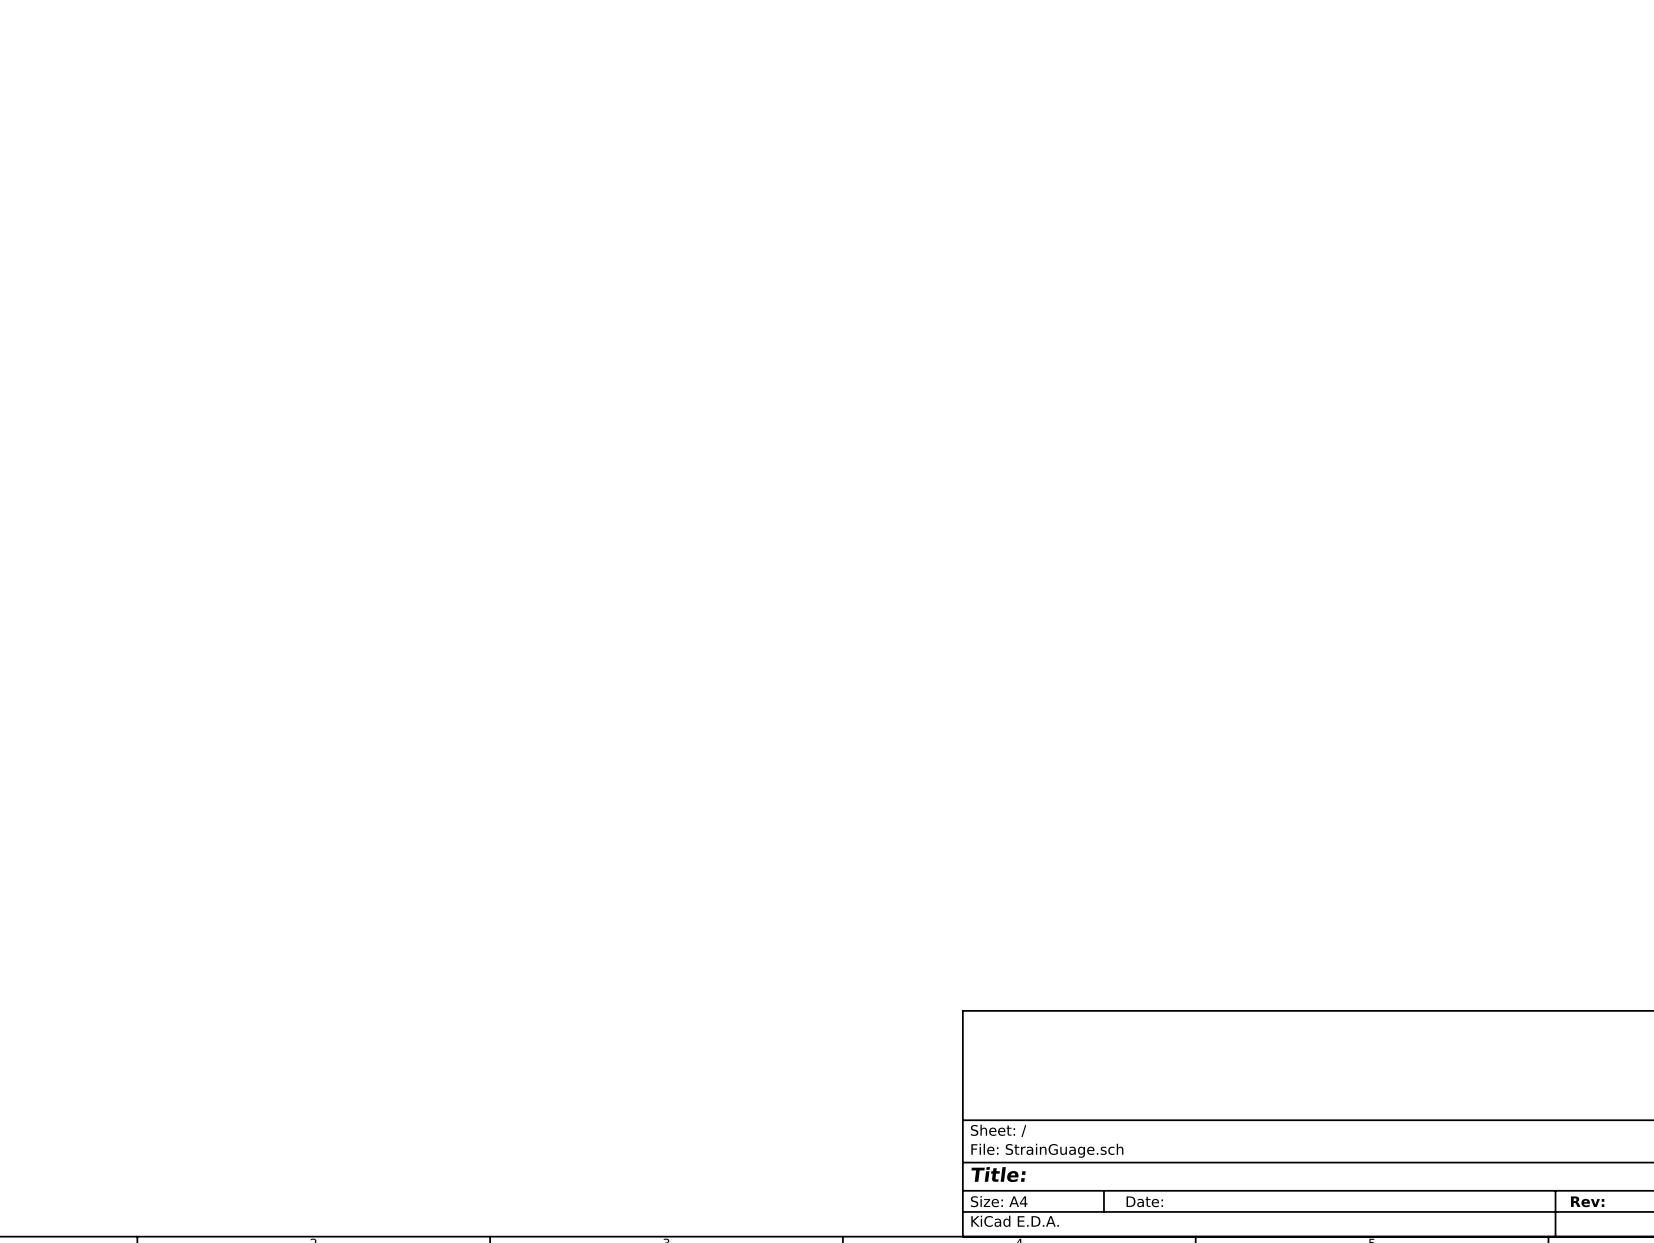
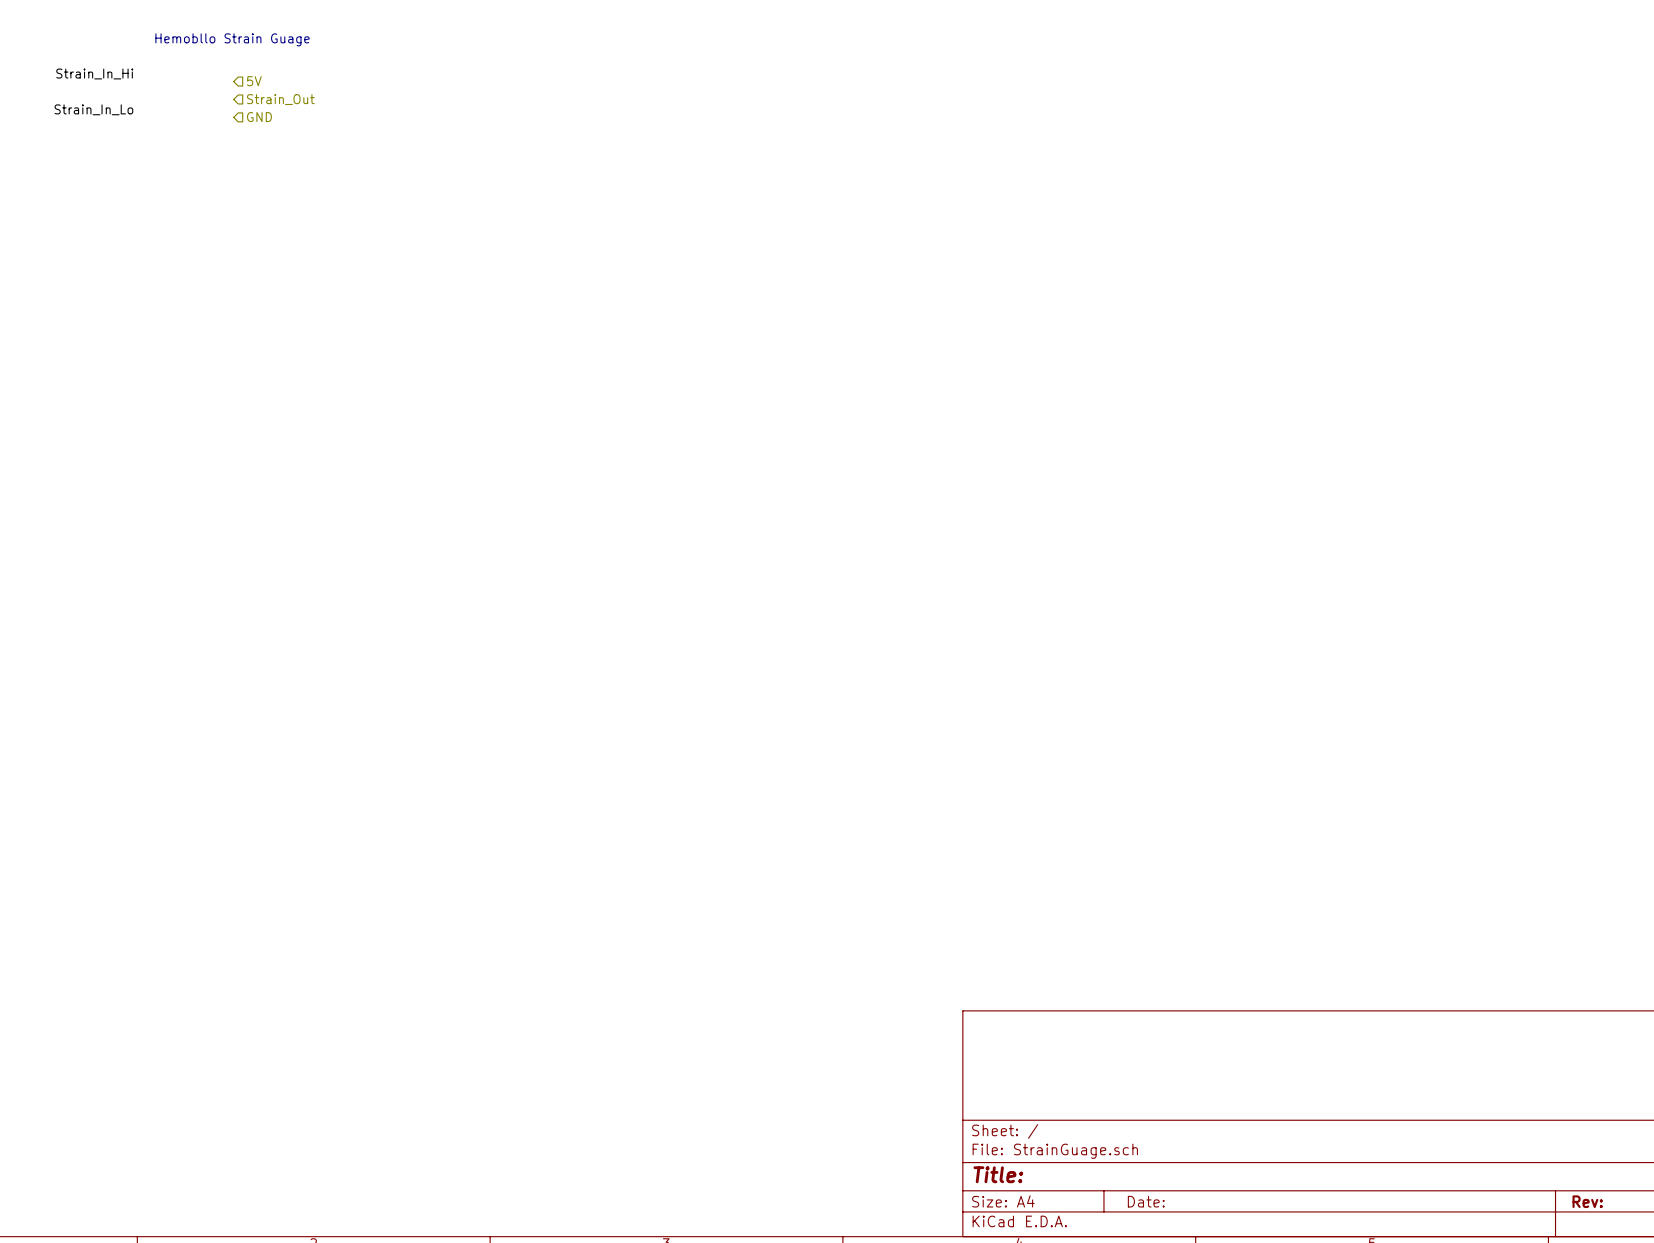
text: none -> Hemobllo Strain Guage (232, 39)
label: none -> Strain_In_Hi (94, 73)
hierarchical label: none -> 5V (254, 81)
hierarchical label: none -> Strain_Out (280, 99)
label: none -> Strain_In_Lo (93, 109)
hierarchical label: none -> GND (259, 117)

